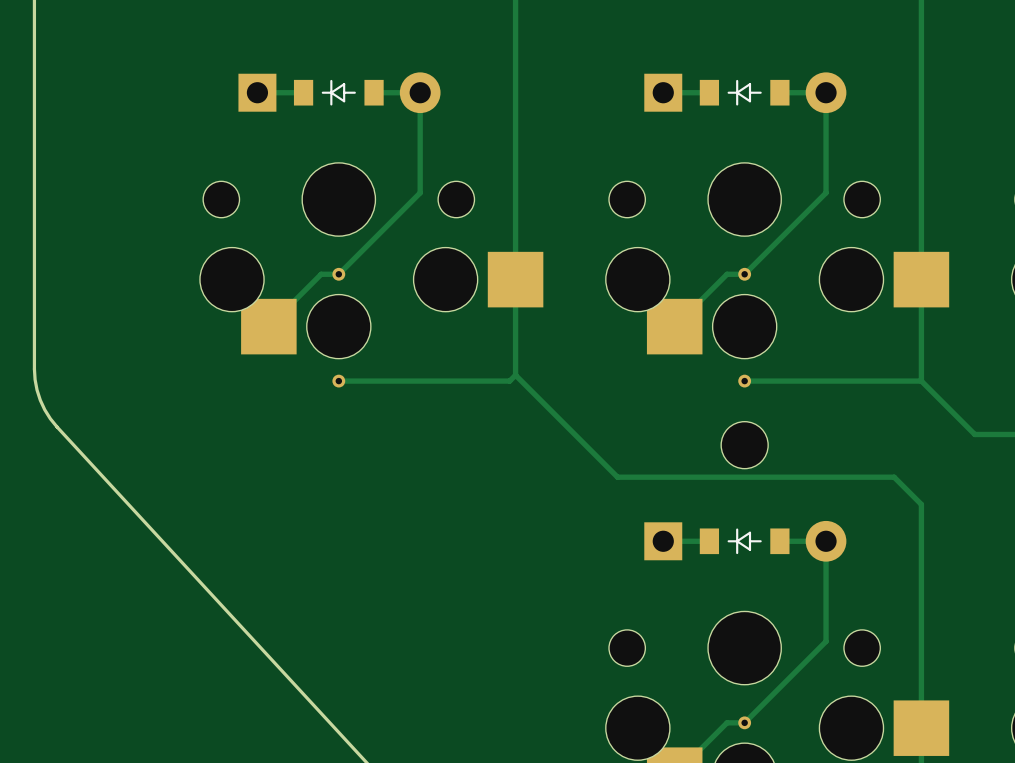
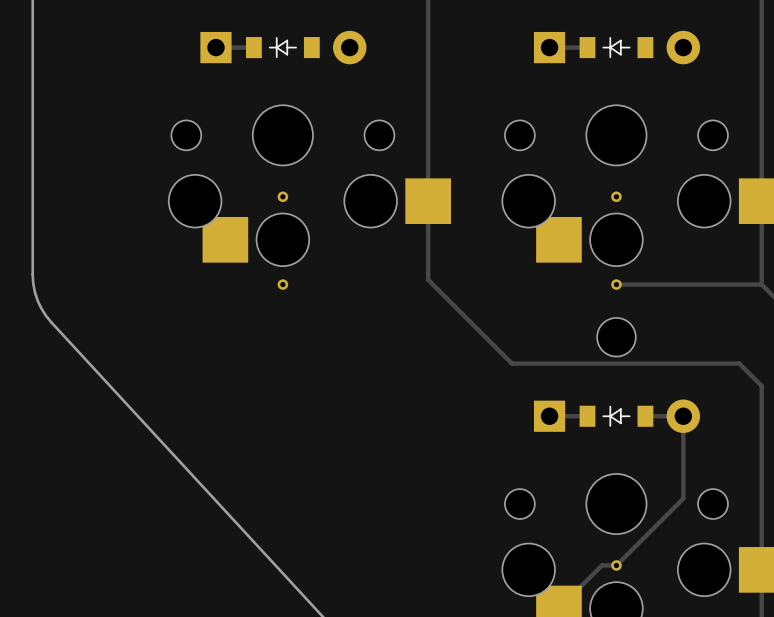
track: (374, 92) (420, 92) (420, 192) (338, 274) (321, 274) (268, 326) -> none
track: (779, 92) (826, 92) (826, 192) (744, 274) (727, 274) (674, 326) -> none
track: (515, 375) (509, 381) (338, 381) -> none

